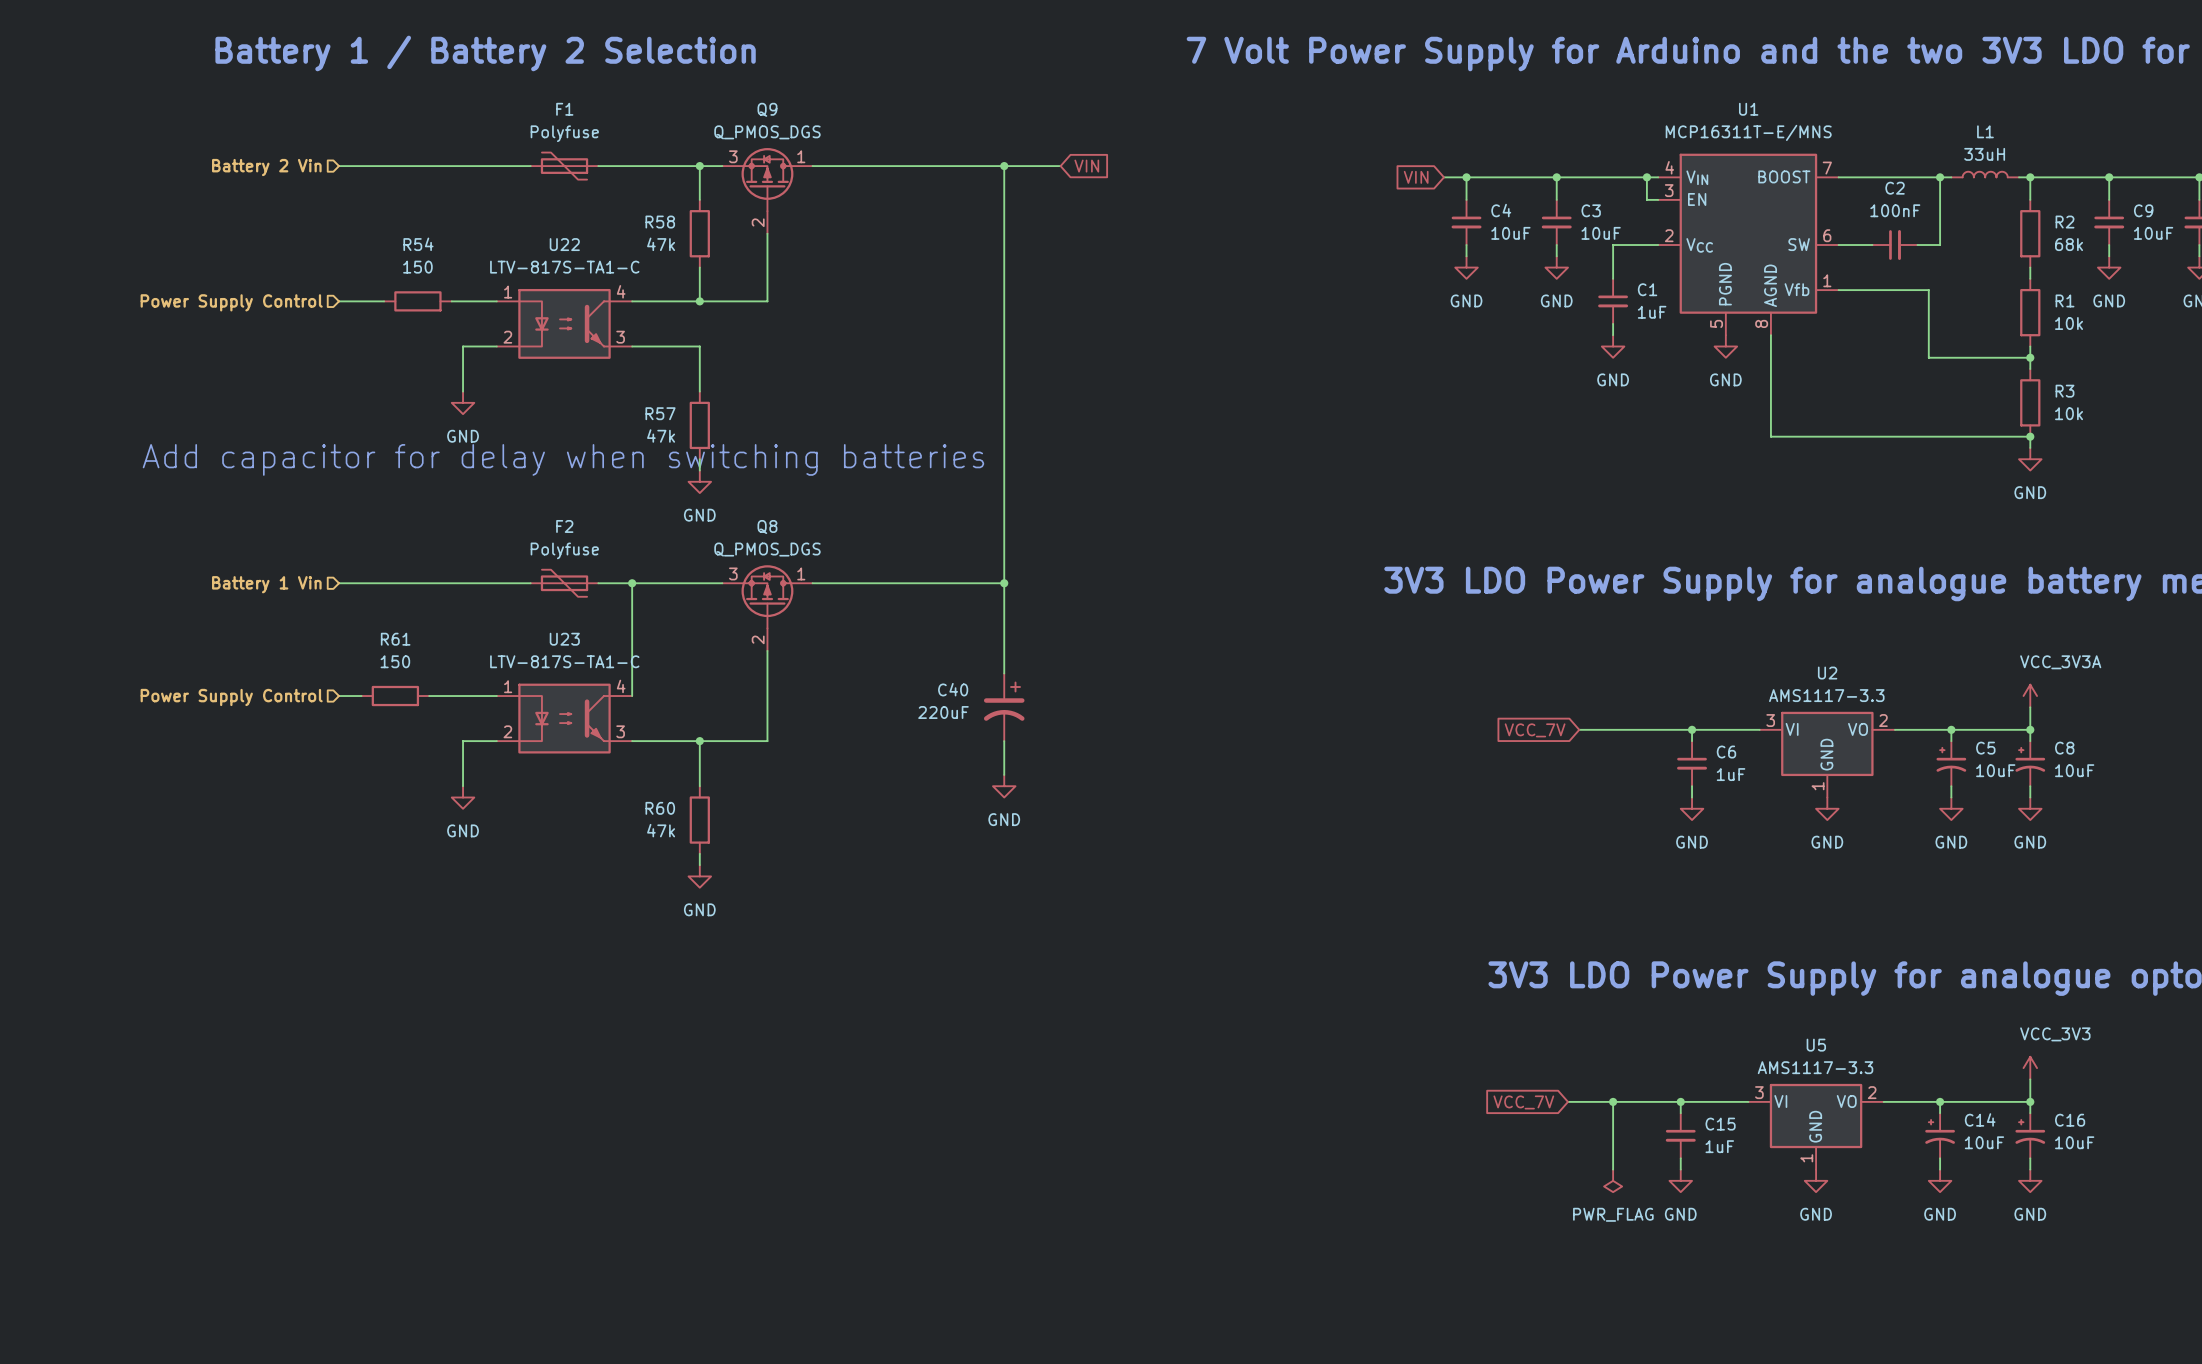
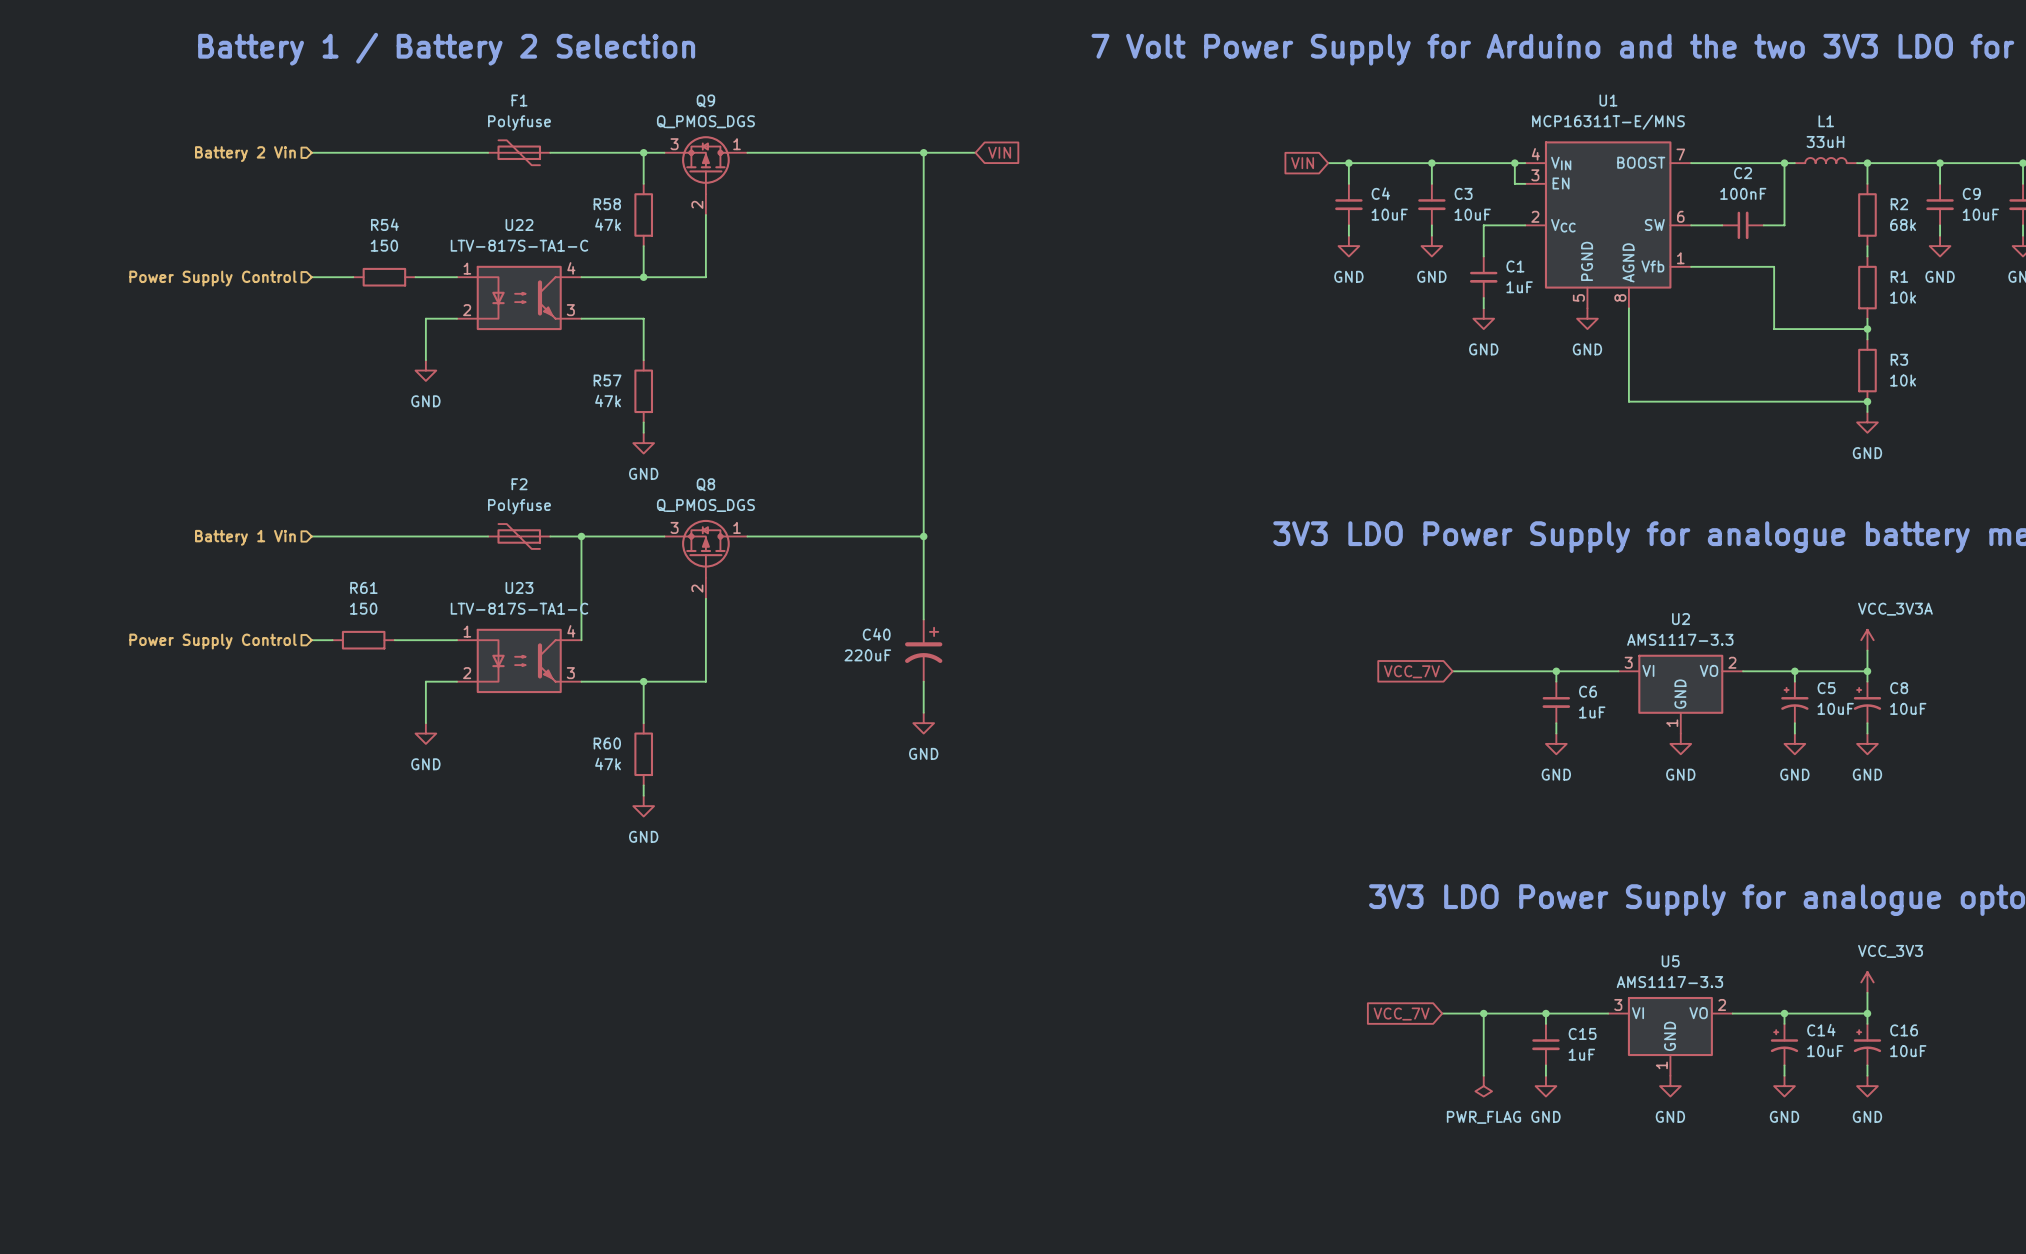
text: Add capacitor for delay when switching batteries (563, 459) -> none

